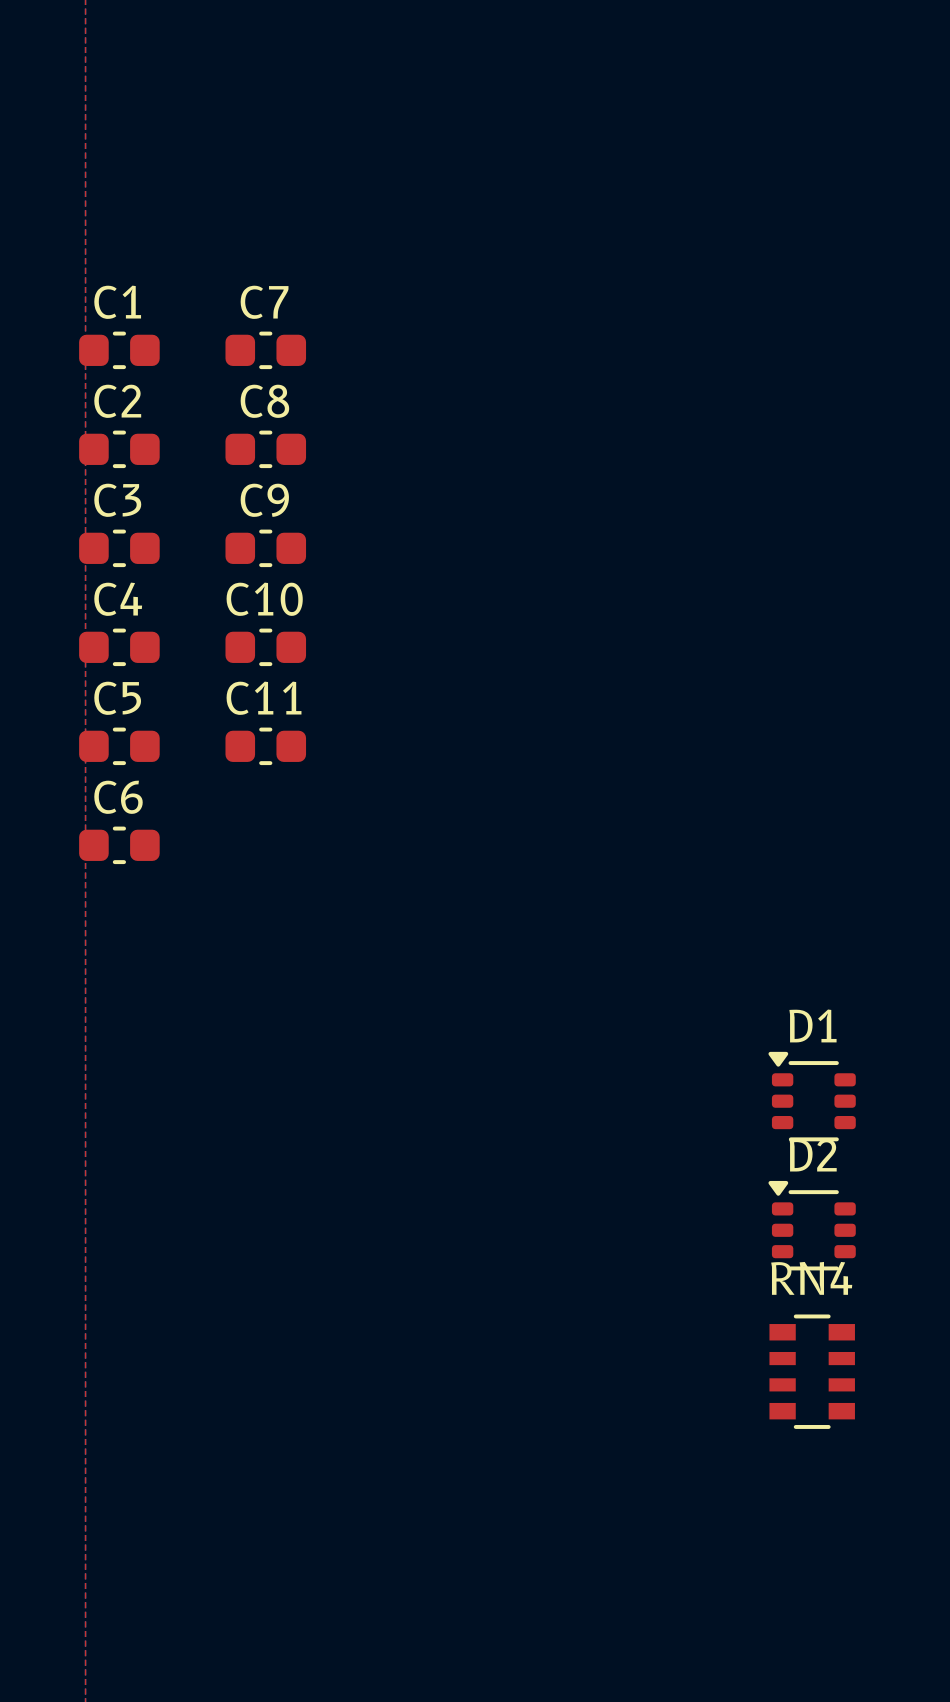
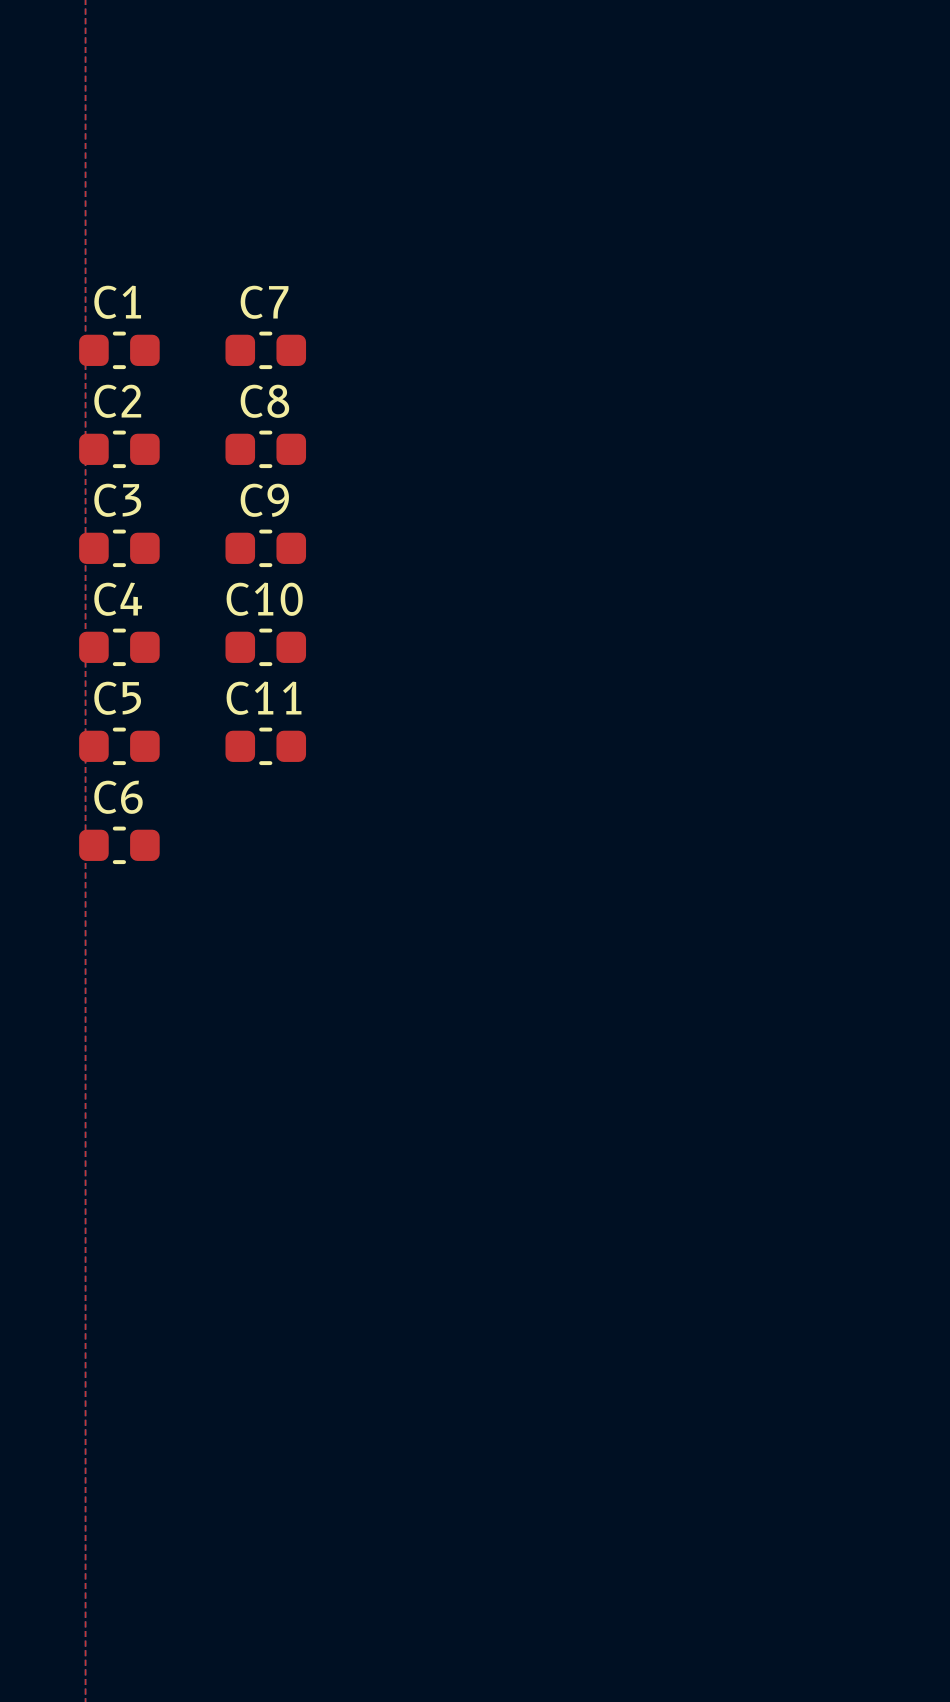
D1: (812, 1096) -> none
D2: (812, 1225) -> none
RN4: (812, 1371) -> none

